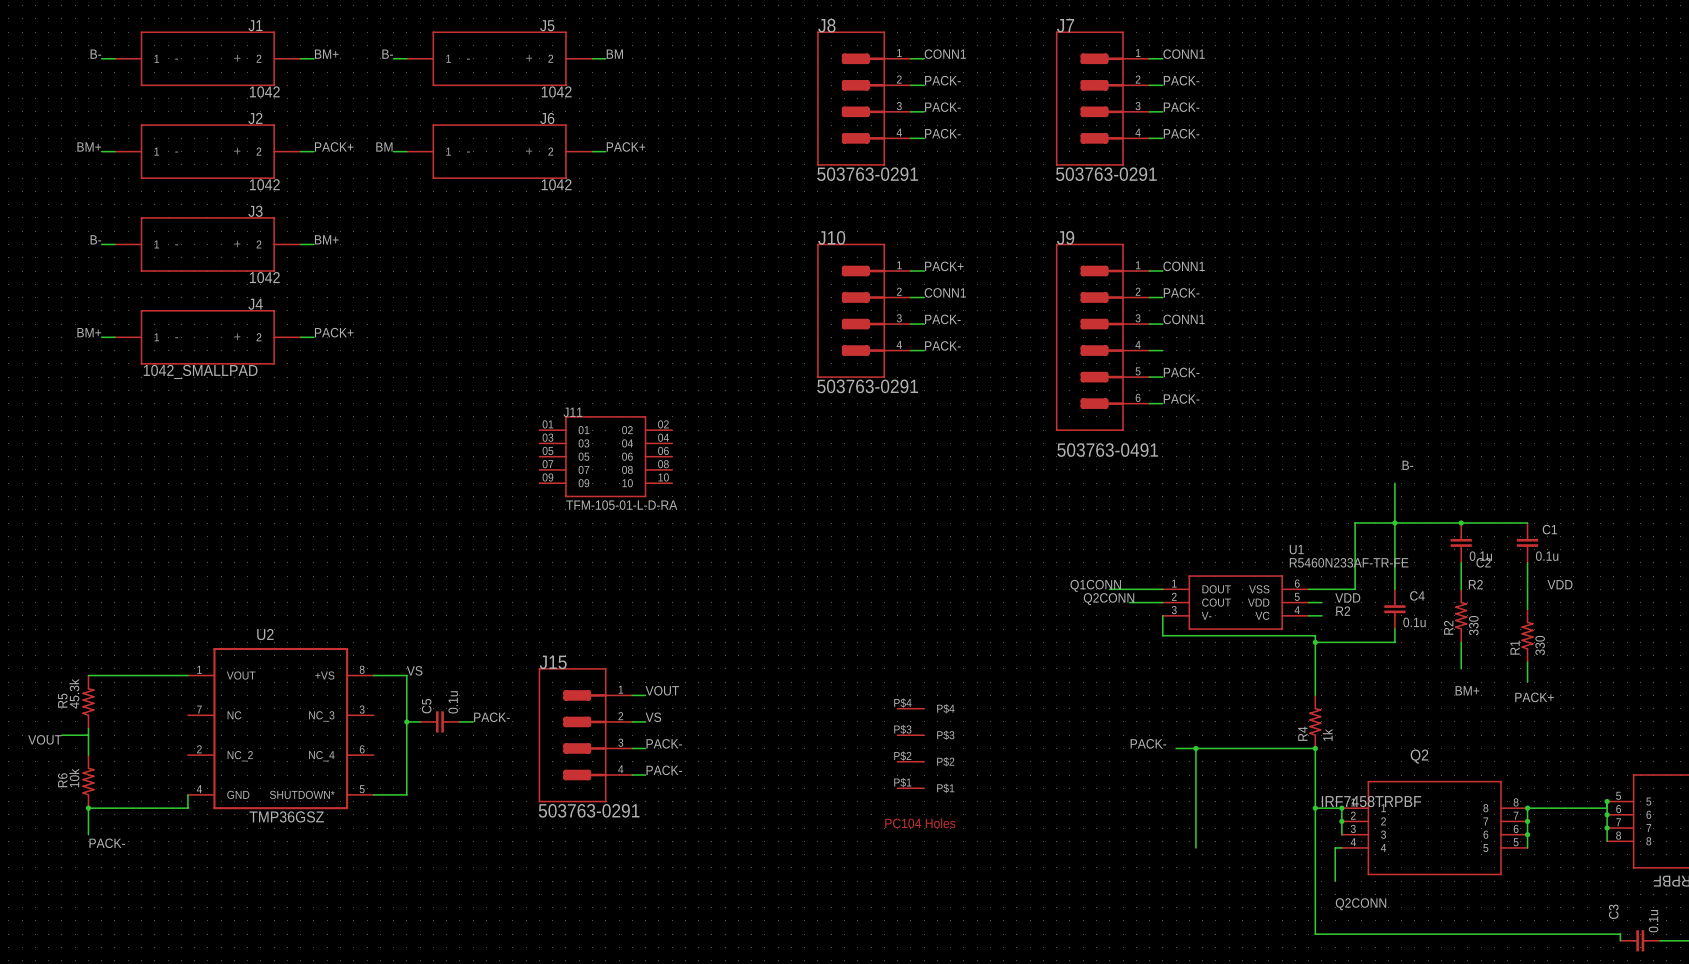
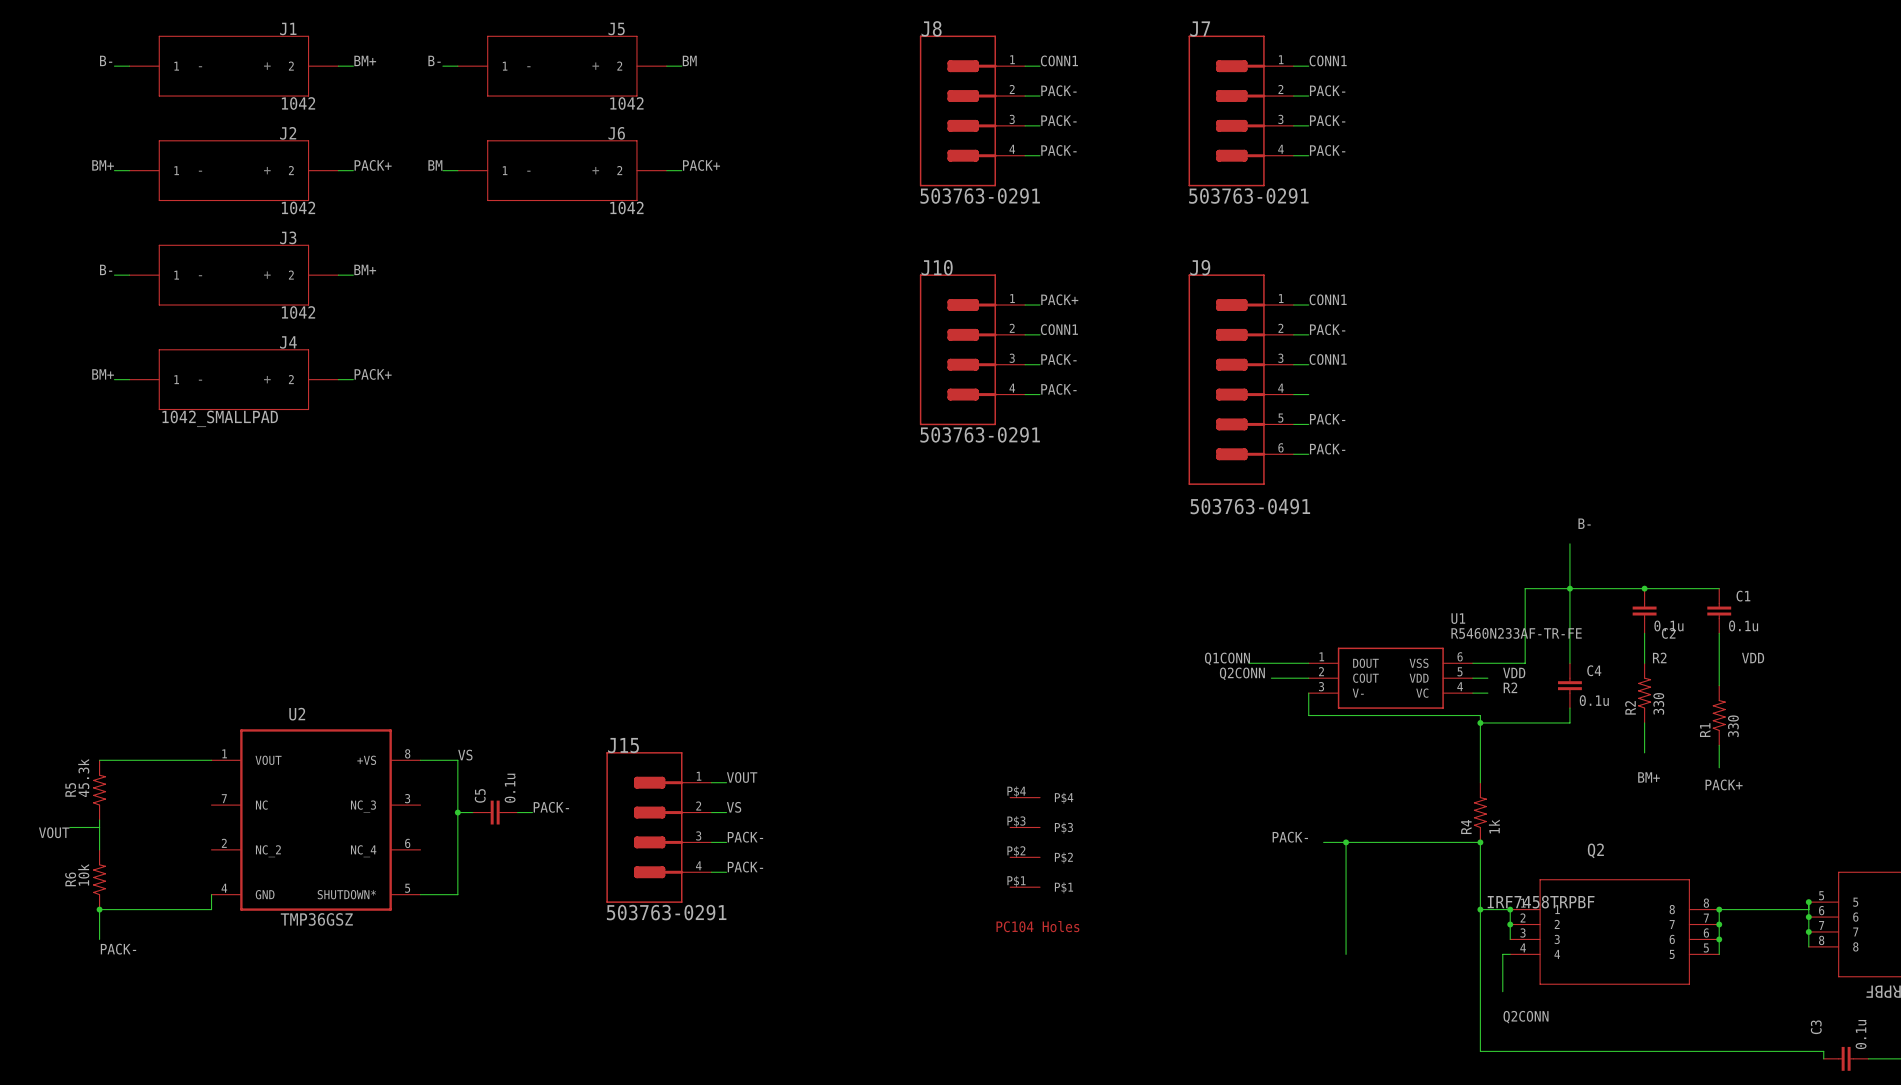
J11: TFM-105-01-L-D-RA (605, 456) -> none

